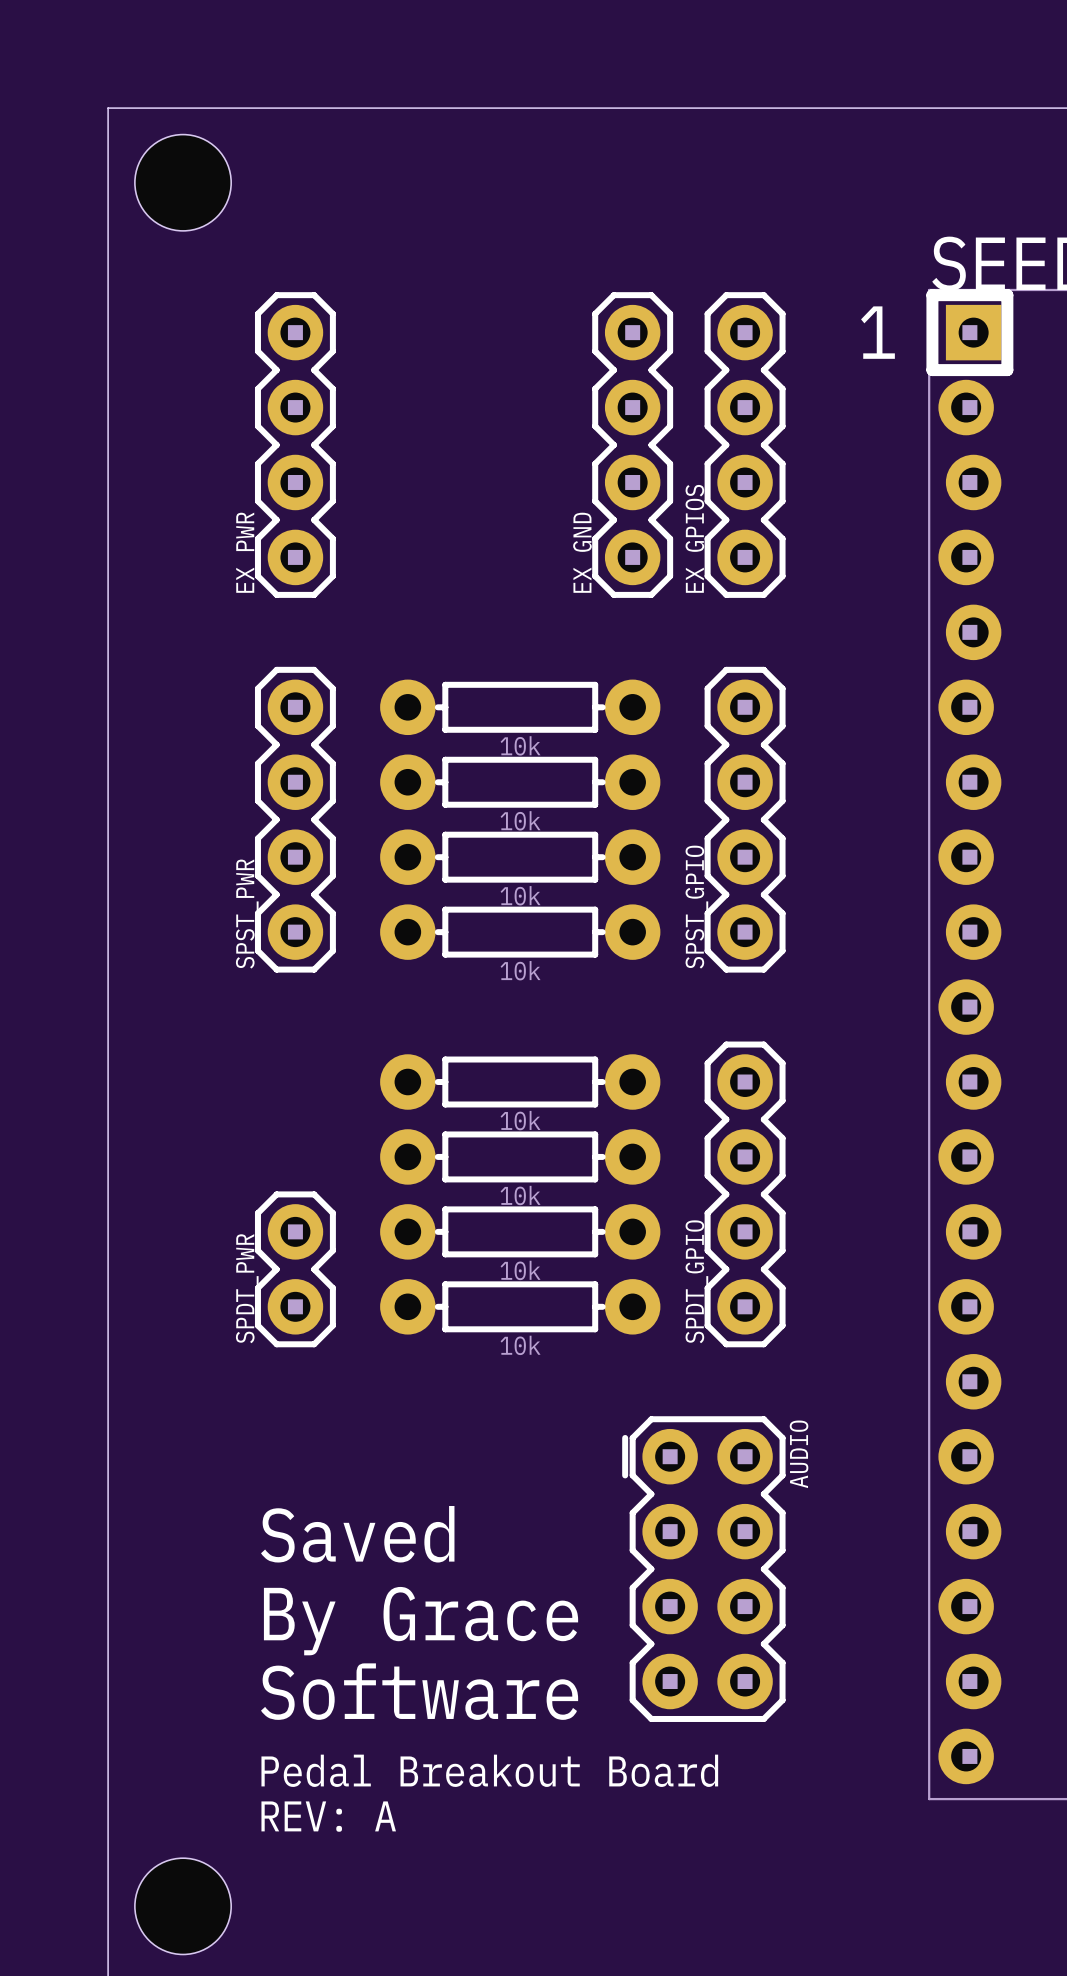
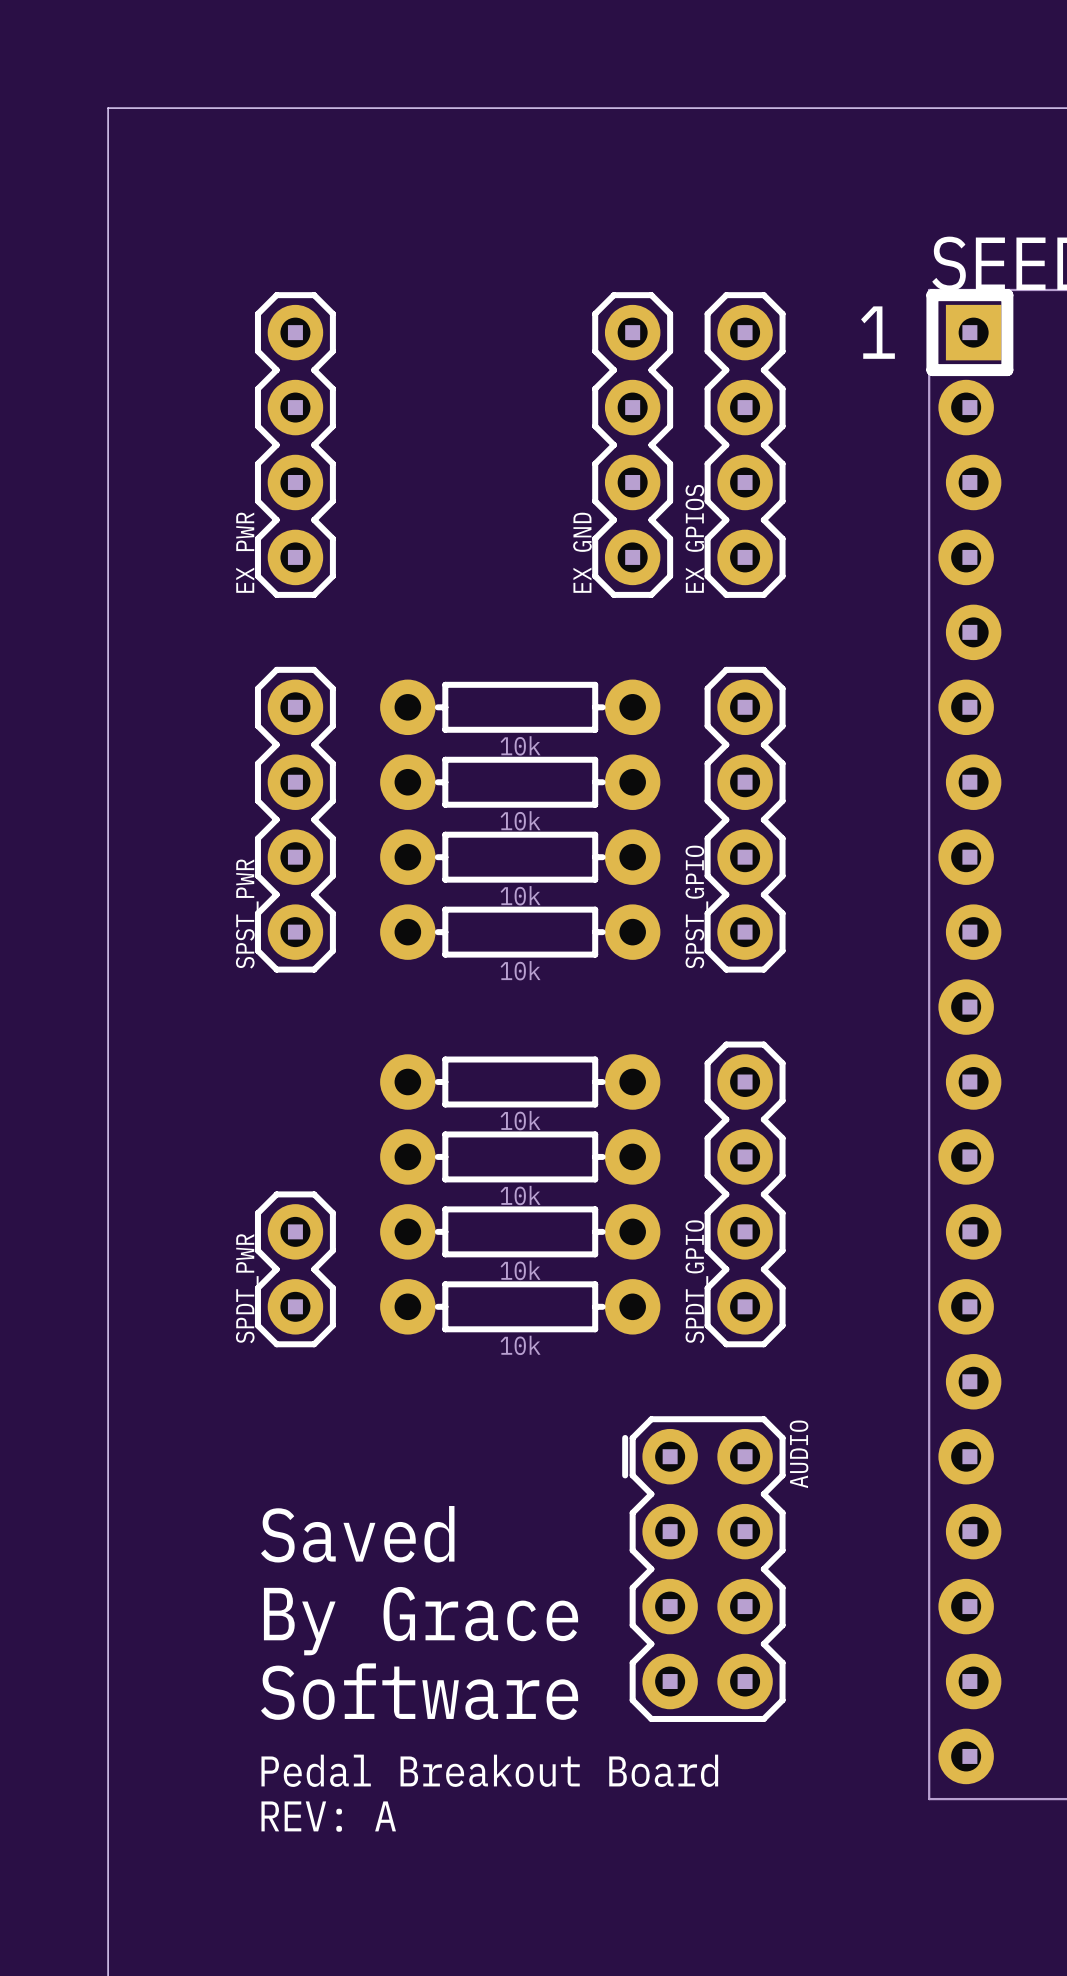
hole: (183, 182) -> none
hole: (183, 1906) -> none

